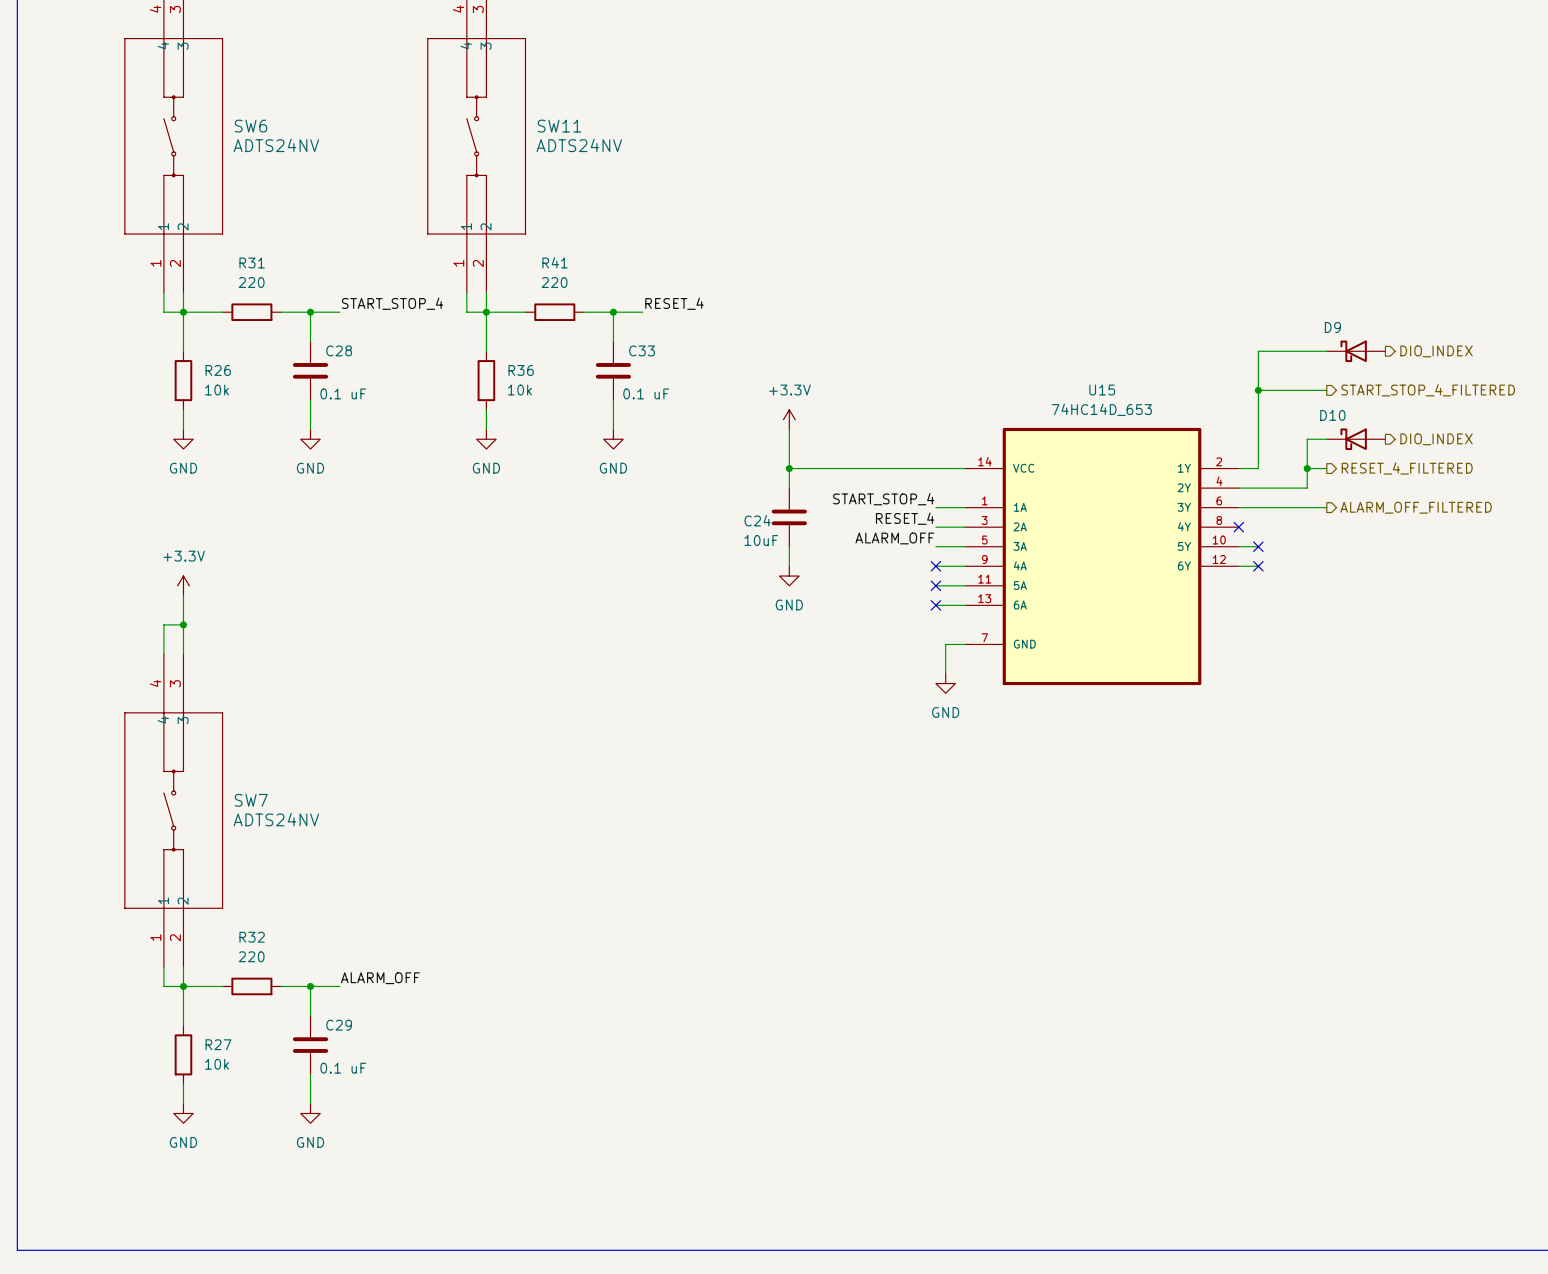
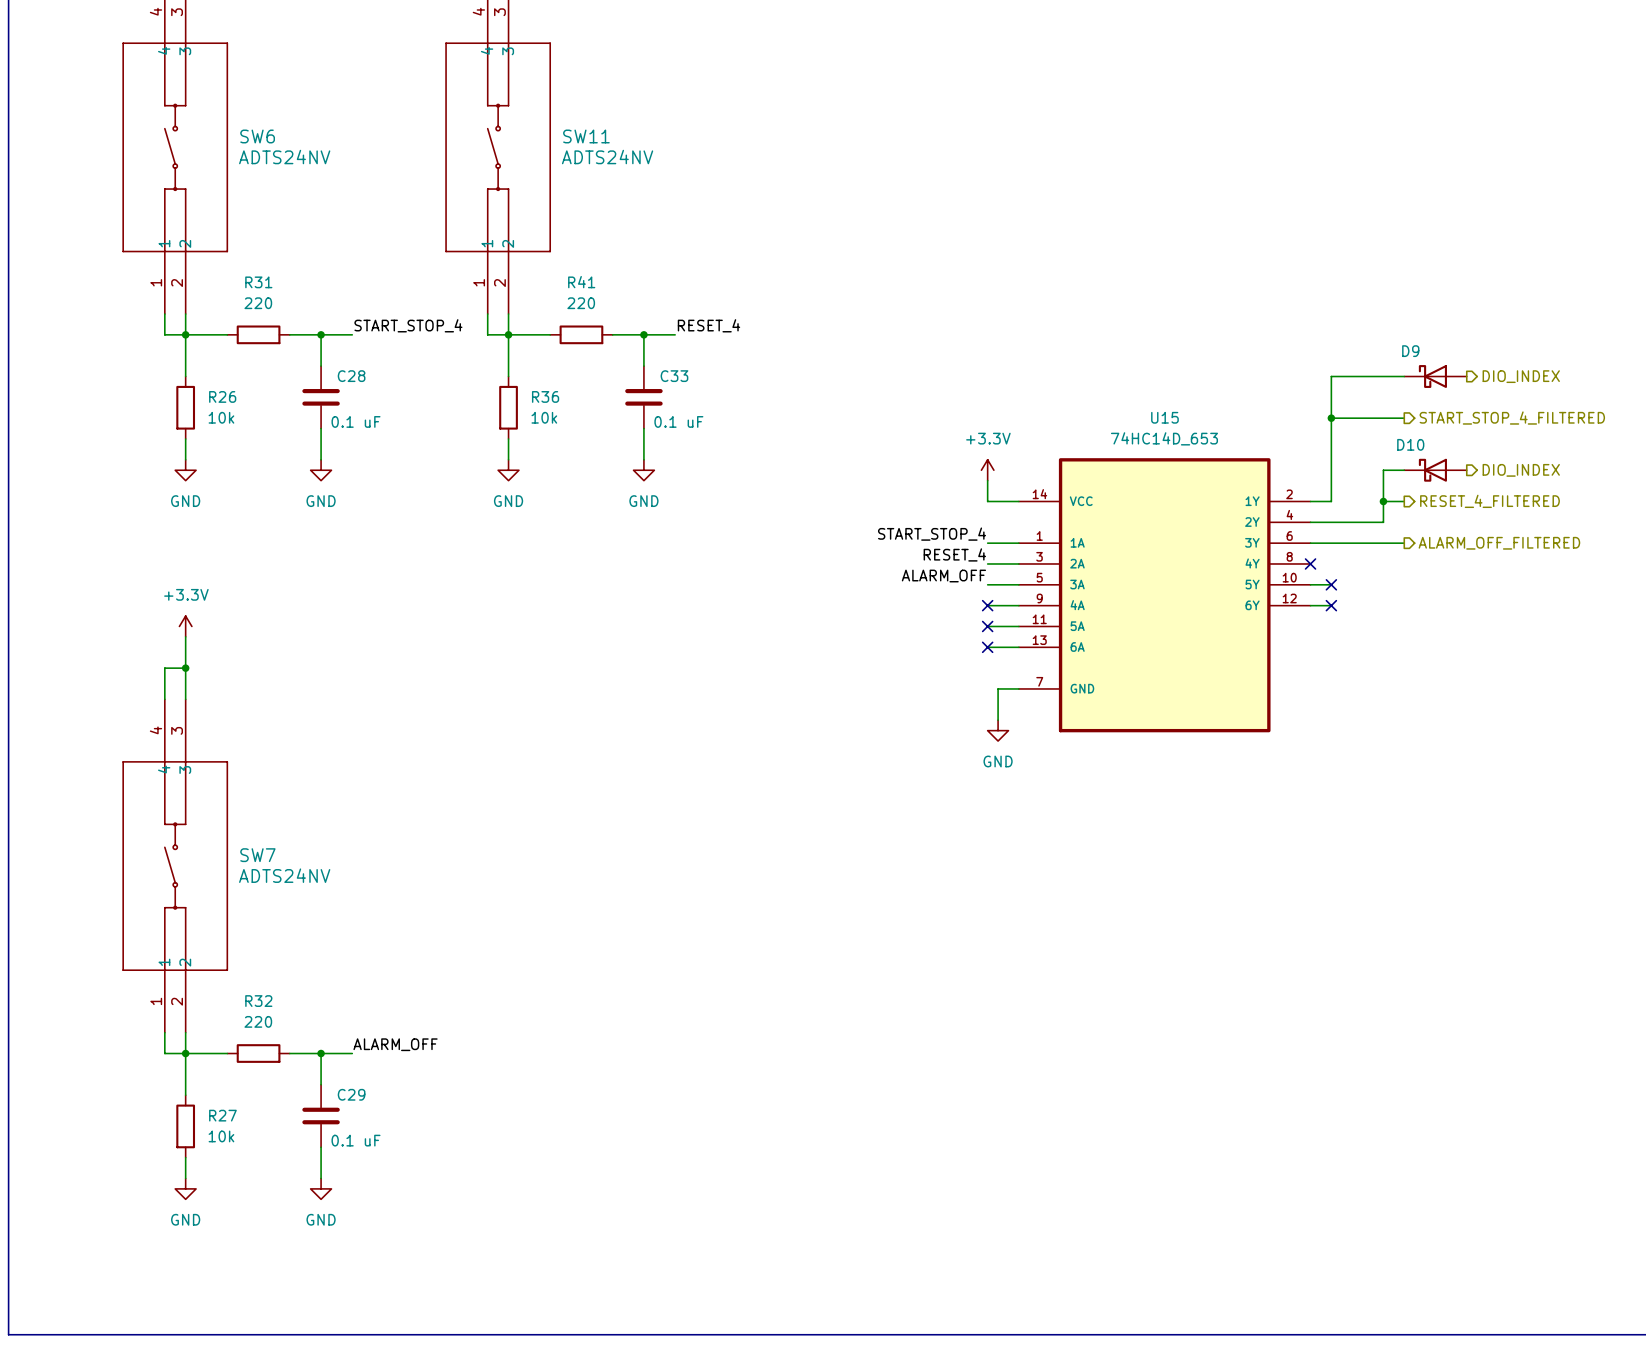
power symbol position: +3.3V (789, 419) -> +3.3V (987, 470)
wire: (789, 429) (789, 488) -> none
wire: (789, 468) (935, 468) -> (987, 480) (987, 501)
junction: (789, 468) -> none
C24: 10uF (789, 517) -> none
wire: (789, 546) (789, 566) -> none
power symbol: GND (789, 576) -> none

